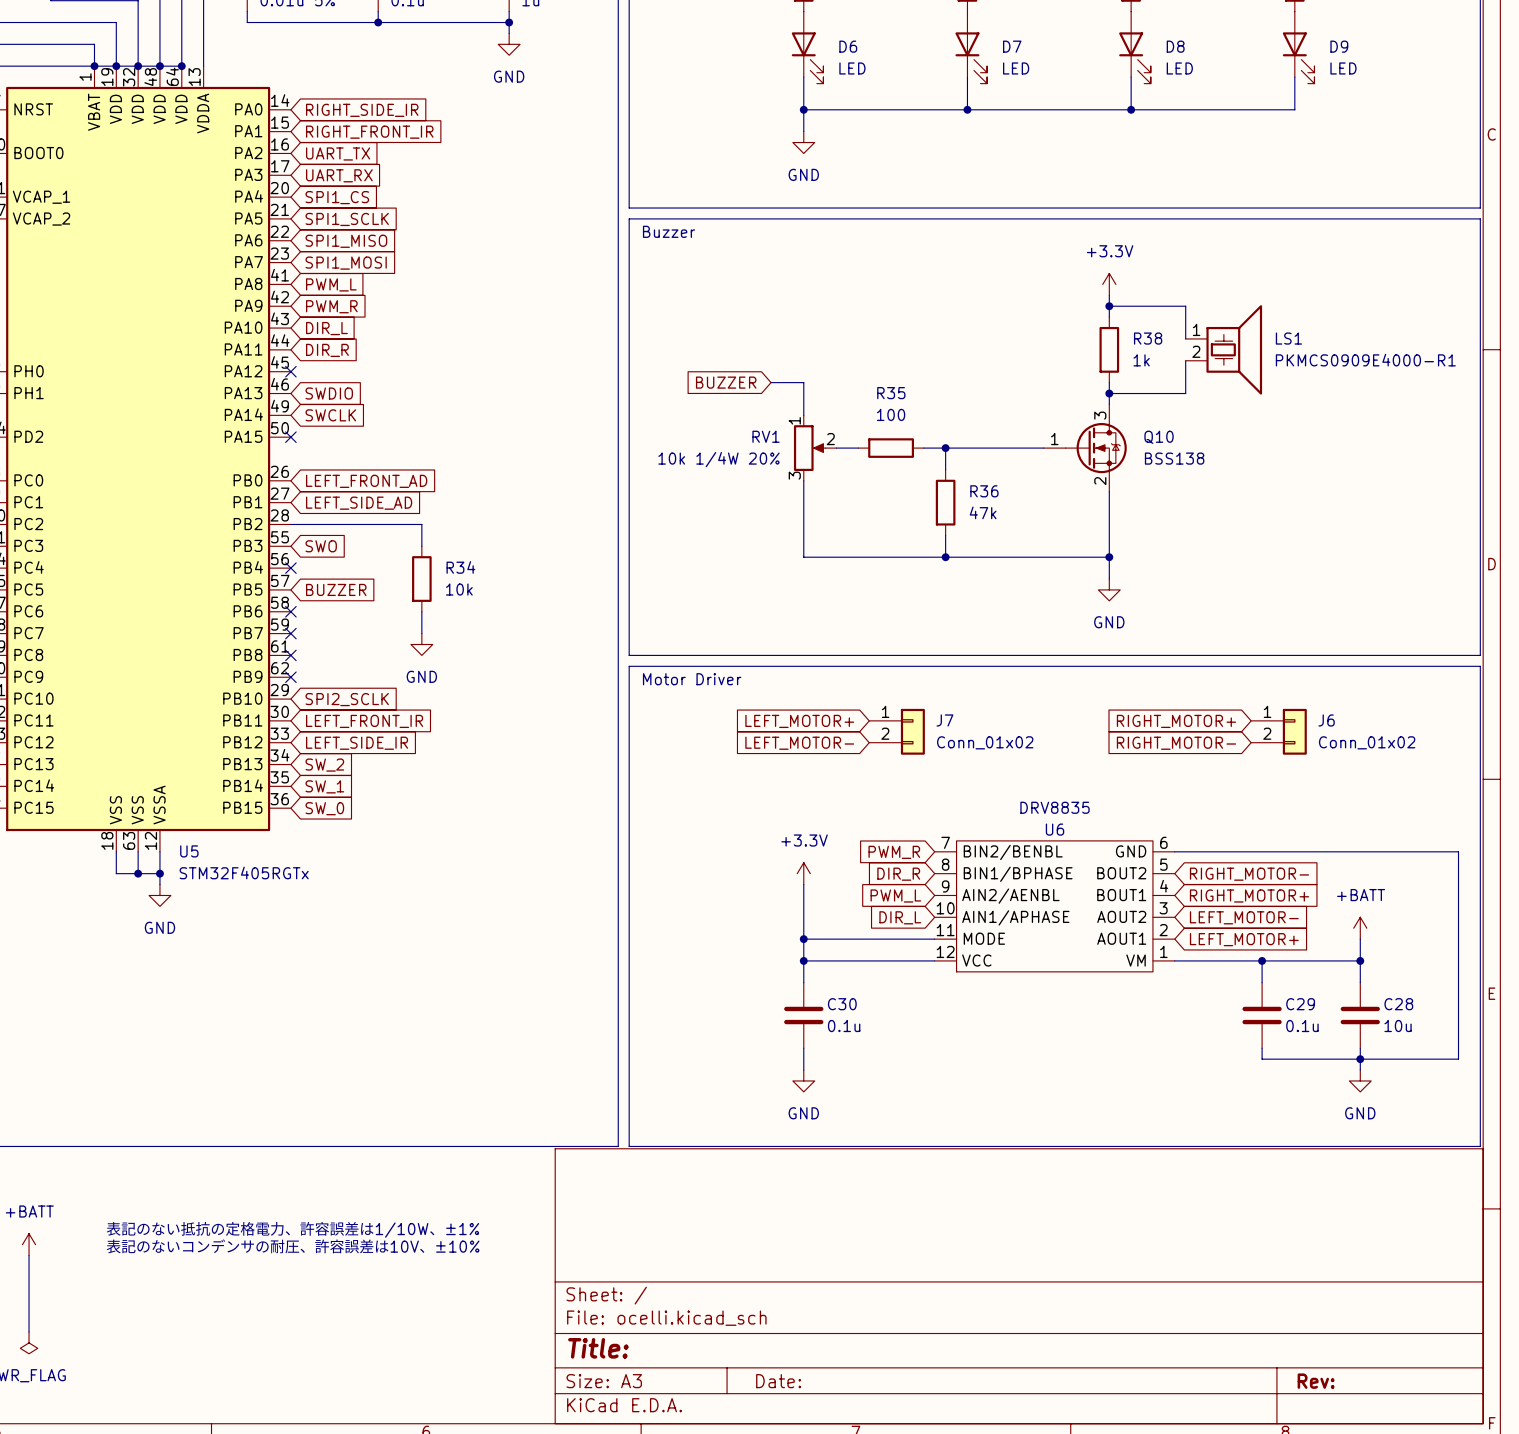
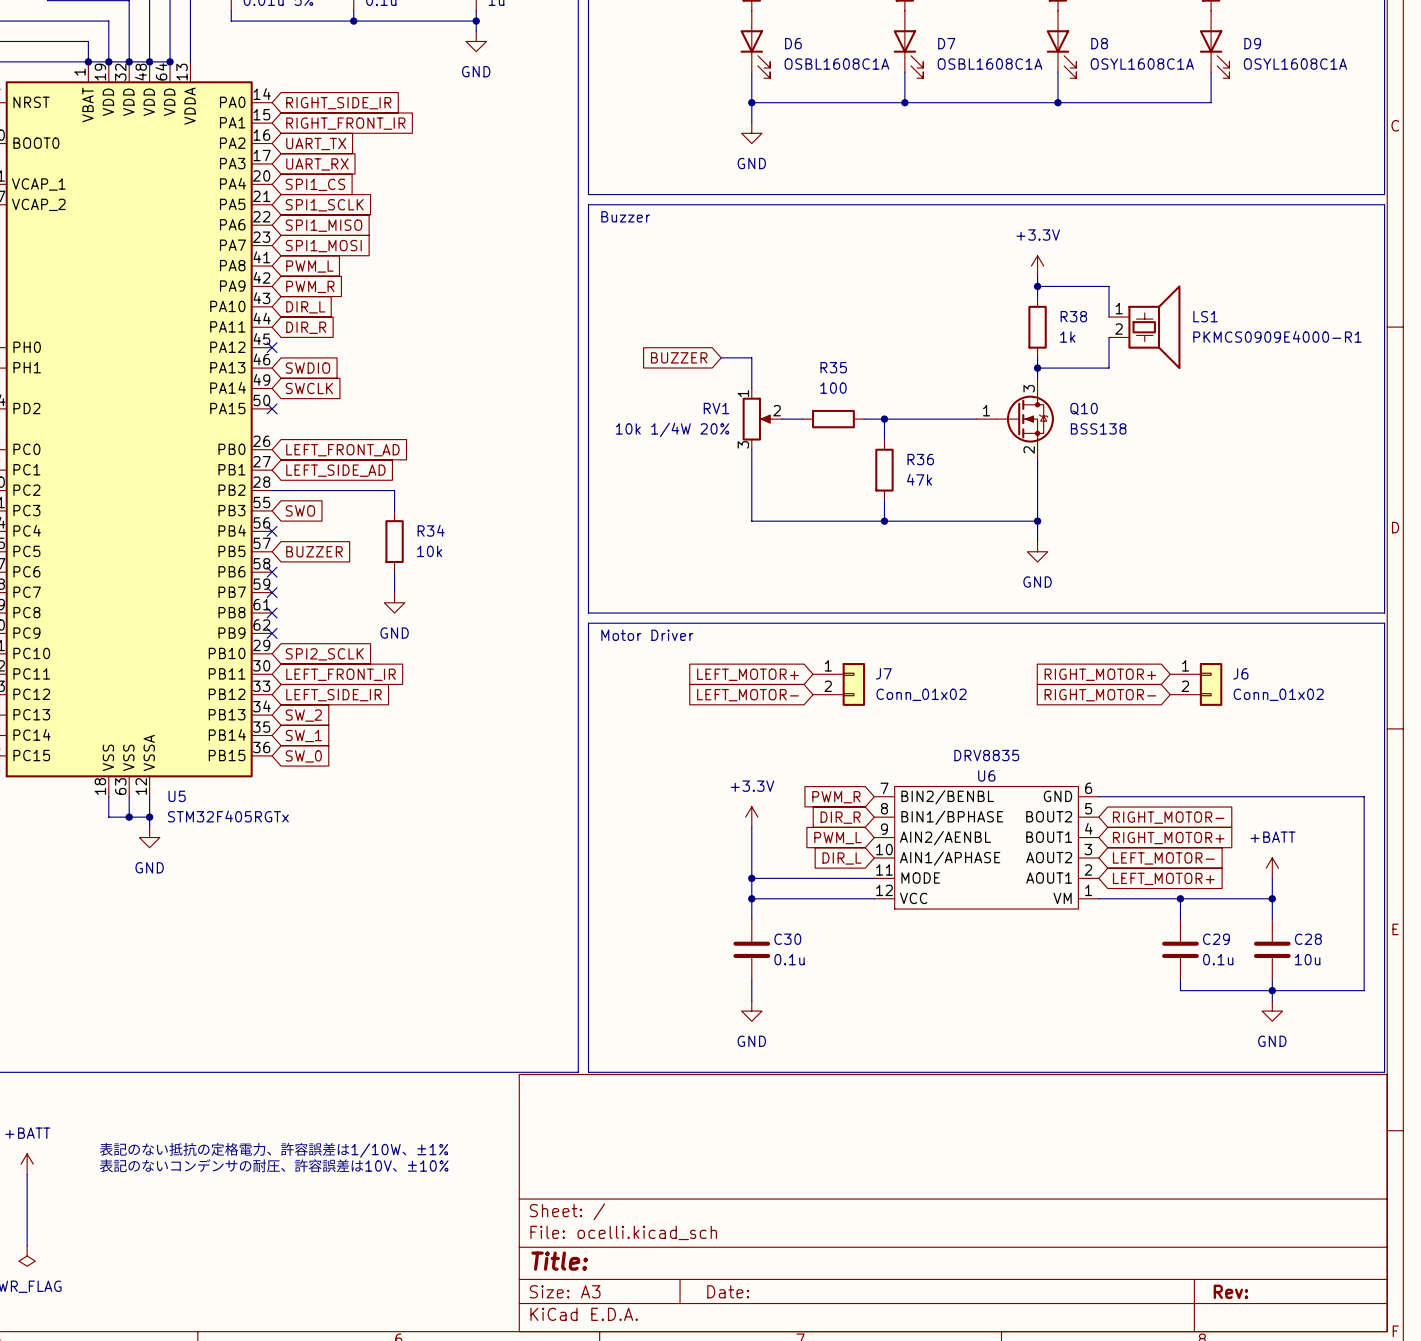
D6 value: LED (852, 68) -> OSBL1608C1A (836, 64)
D7 value: LED (1016, 68) -> OSBL1608C1A (990, 64)
D8 value: LED (1179, 68) -> OSYL1608C1A (1142, 64)
D9 value: LED (1343, 68) -> OSYL1608C1A (1295, 64)

